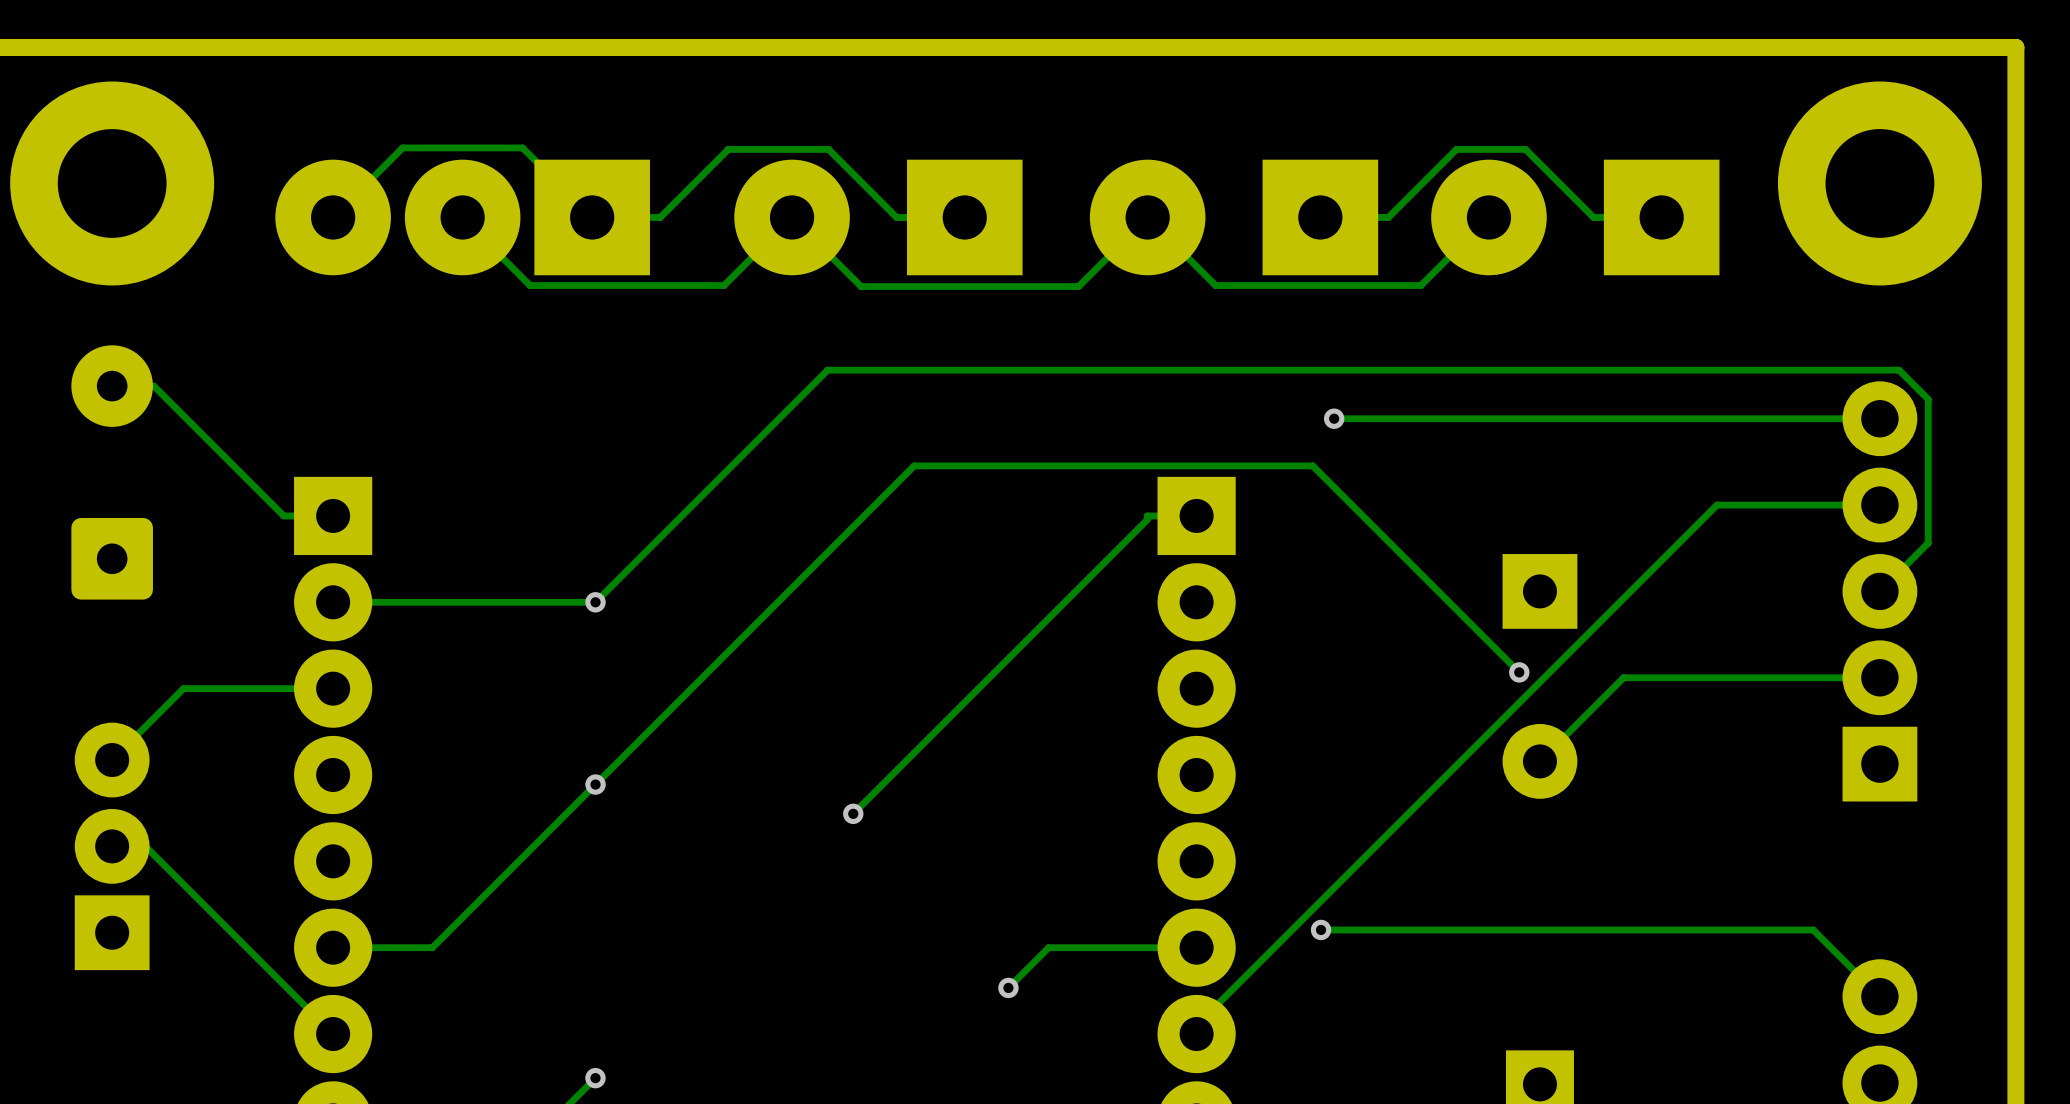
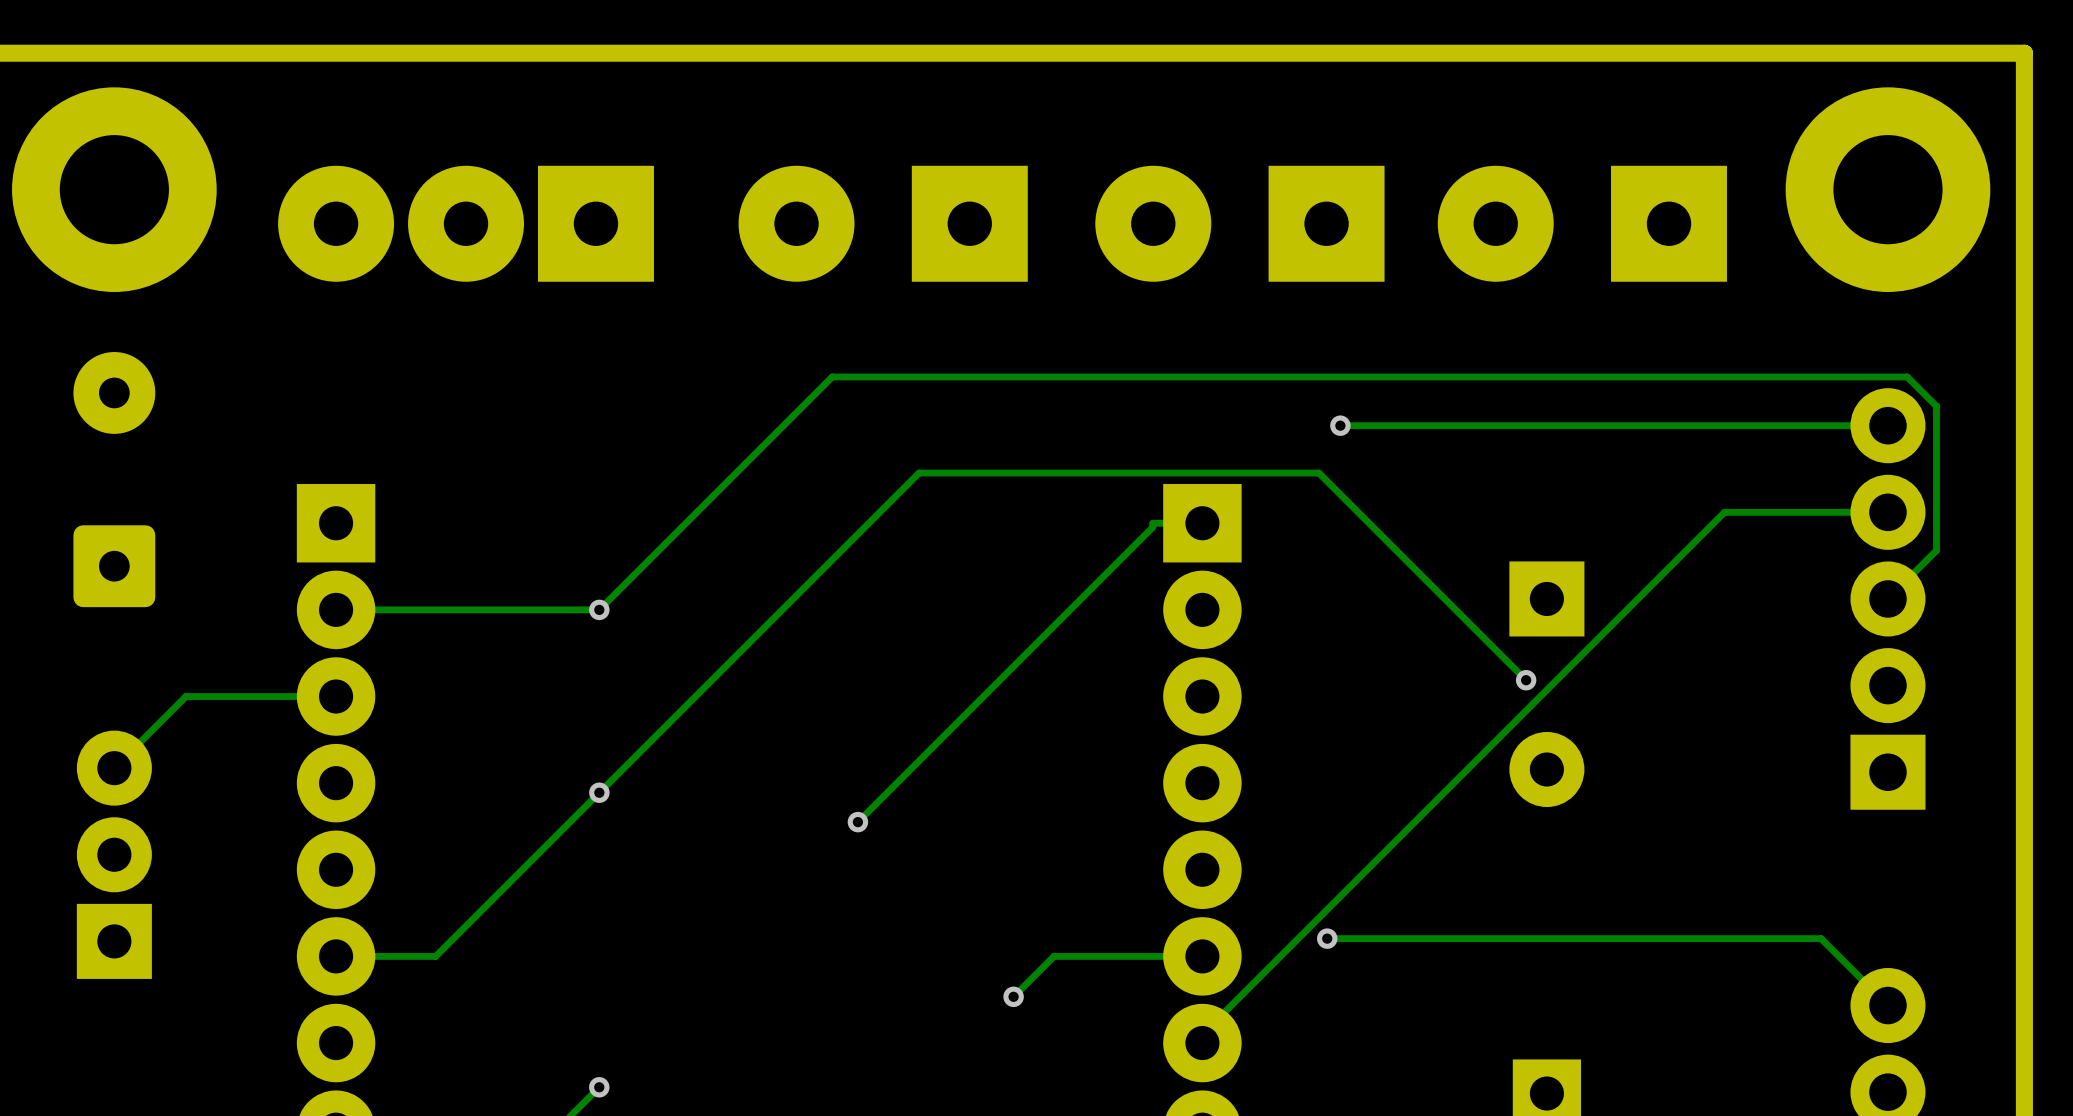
track: (964, 217) (896, 217) (828, 149) (728, 149) (660, 217) (592, 217) (522, 147) (402, 147) (333, 217) -> none
track: (1488, 217) (1420, 285) (1215, 285) (1147, 217) (1078, 286) (861, 286) (792, 217) (724, 285) (530, 285) (462, 218) -> none
track: (1661, 217) (1593, 217) (1525, 149) (1456, 149) (1388, 217) (1320, 217) -> none
track: (112, 386) (153, 386) (283, 515) (333, 515) -> none
track: (1879, 677) (1623, 677) (1539, 761) -> none
track: (112, 846) (145, 846) (333, 1034) -> none

